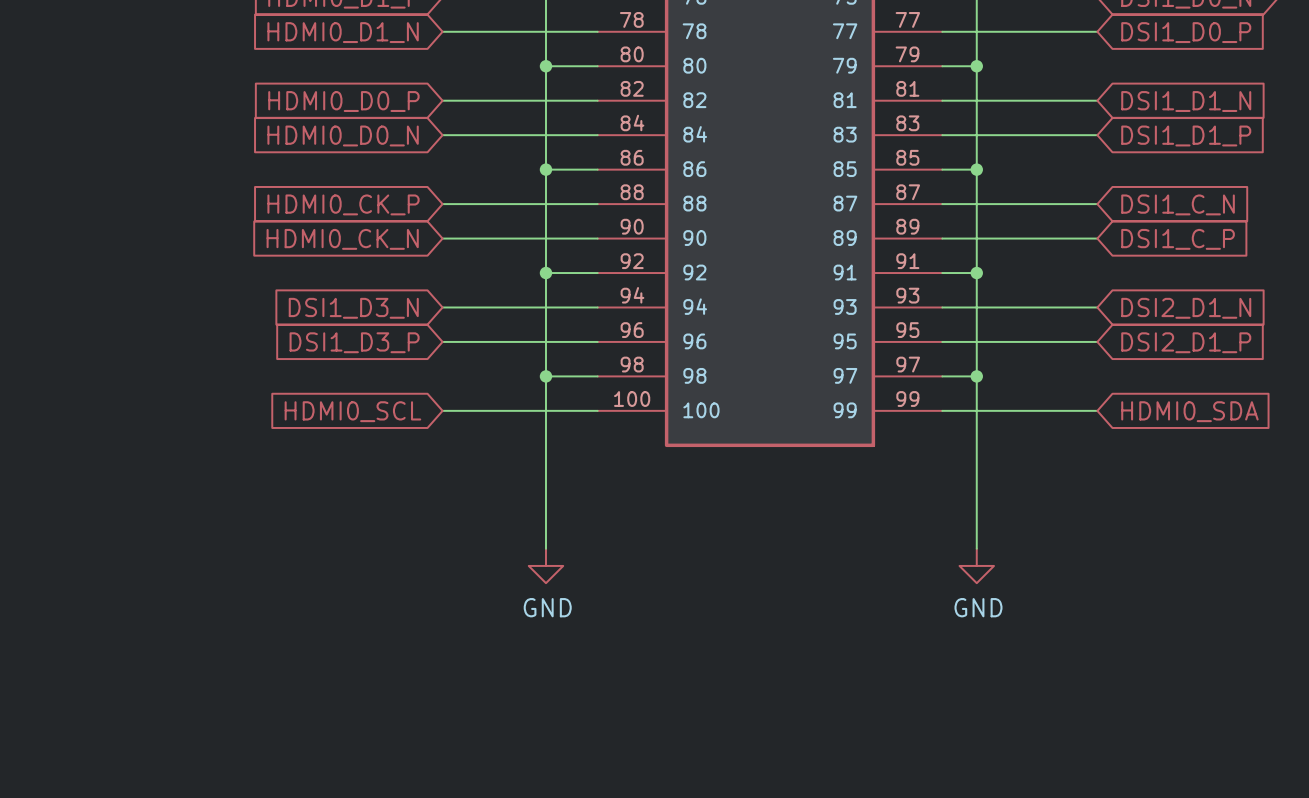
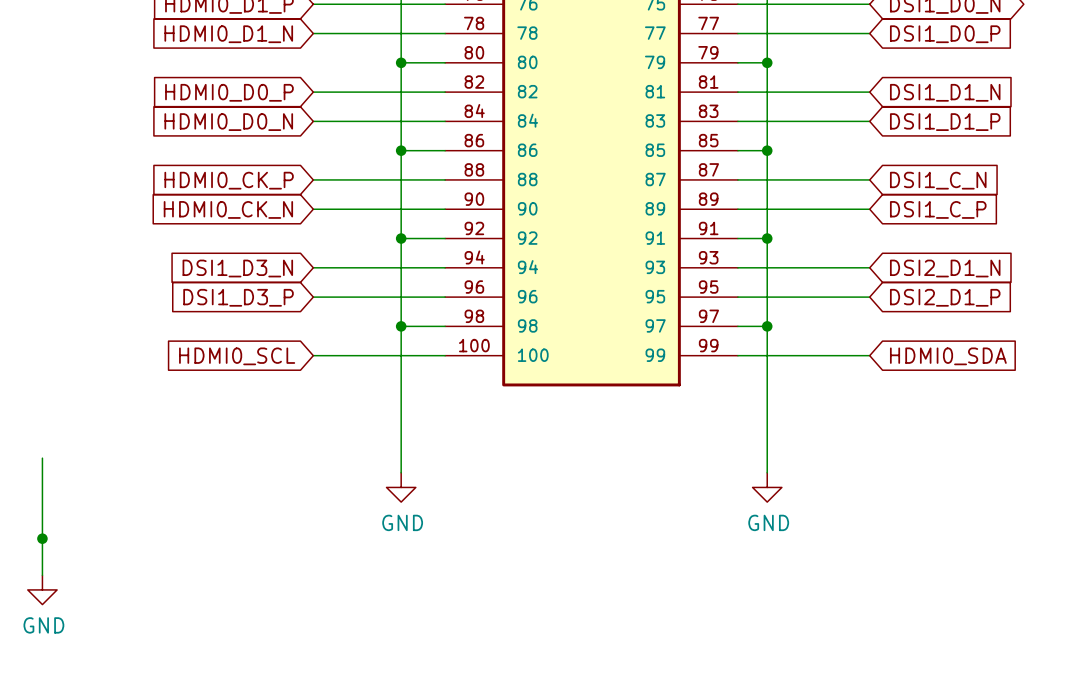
wire: none -> (42, 458) (42, 575)
junction: none -> (42, 538)
power symbol: none -> GND (42, 589)

